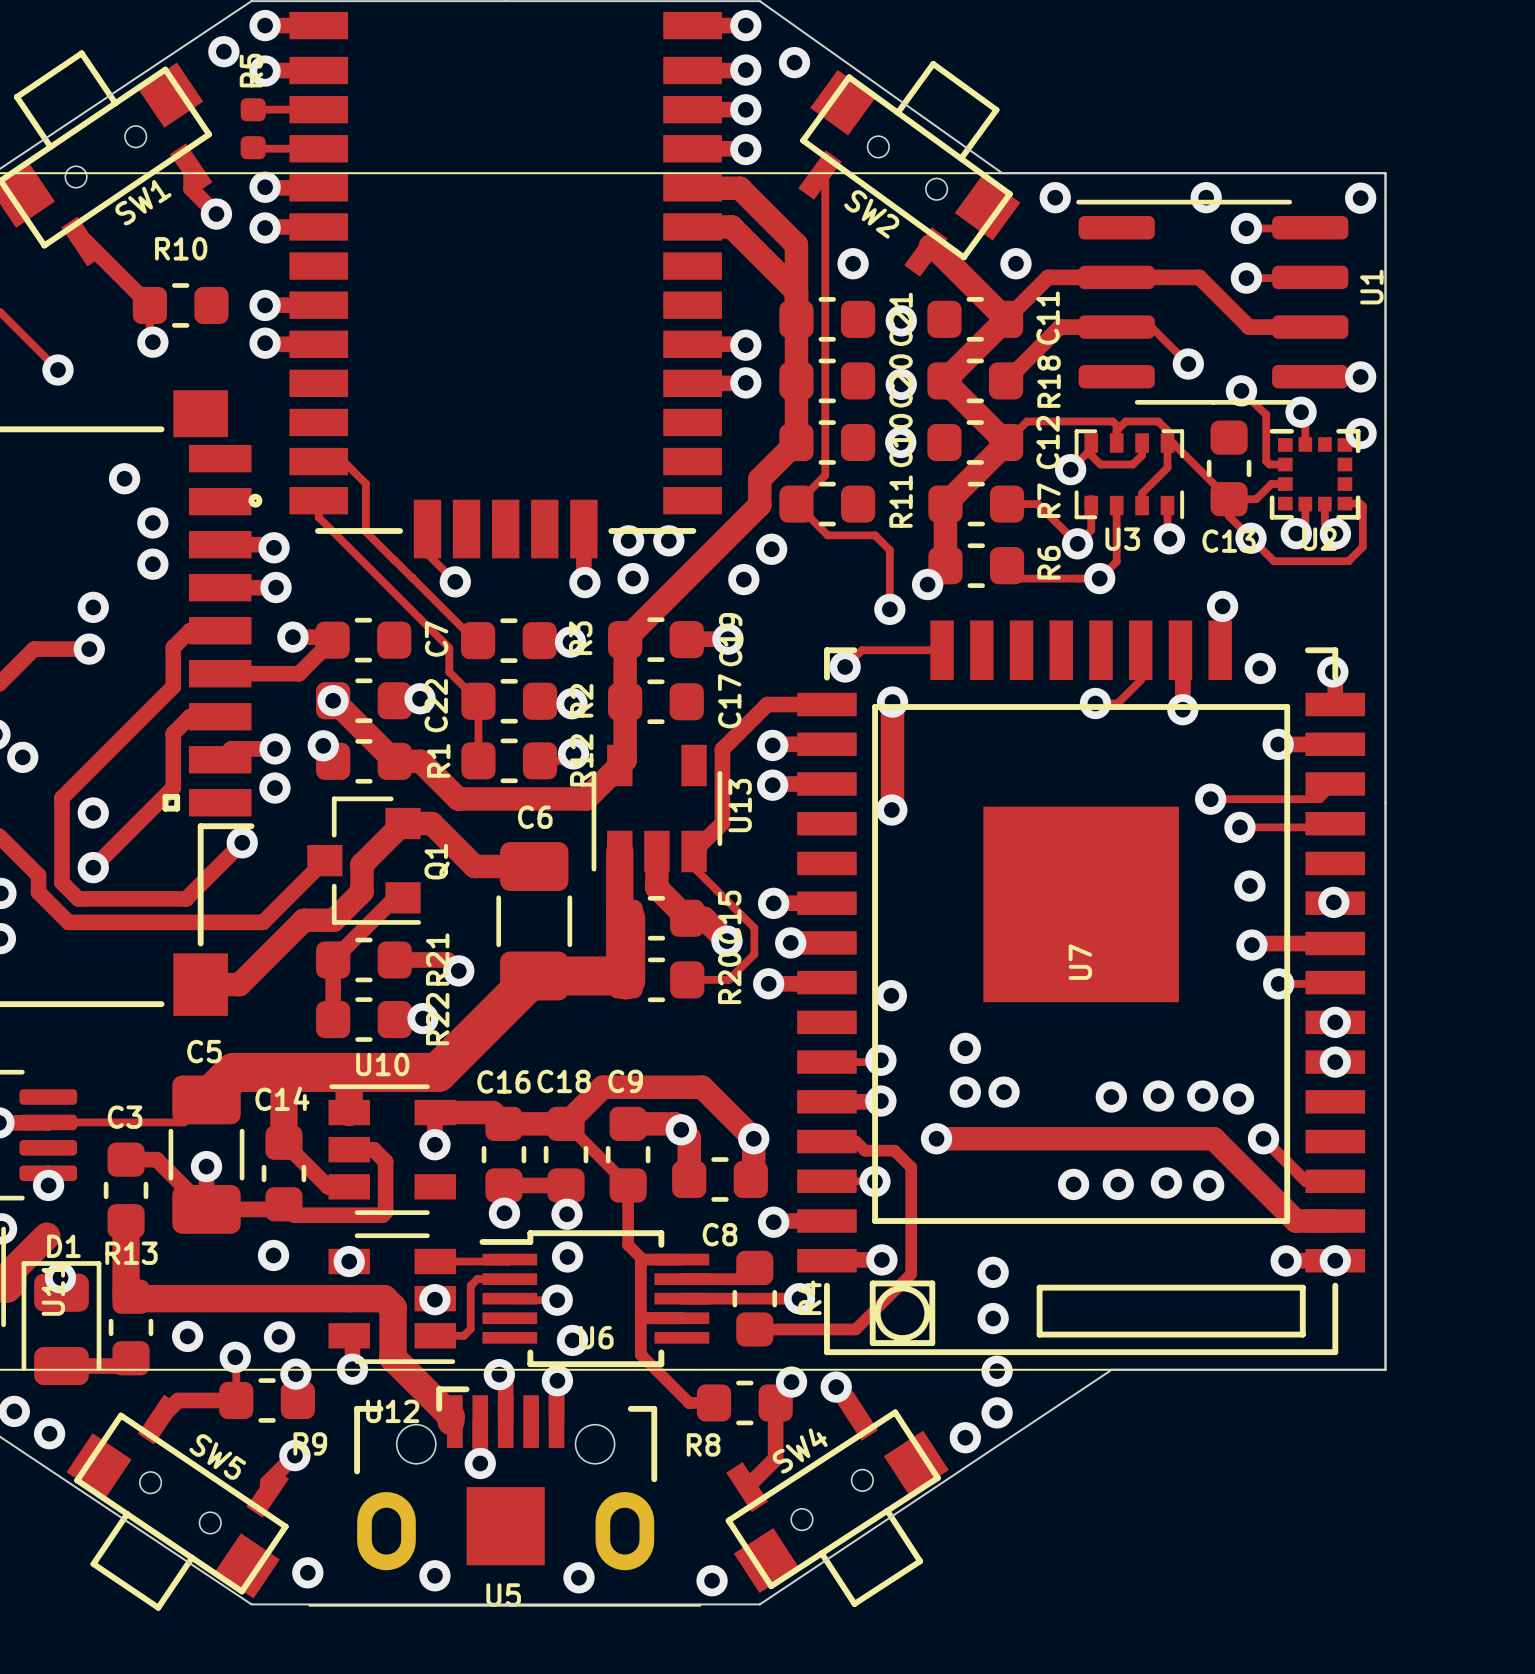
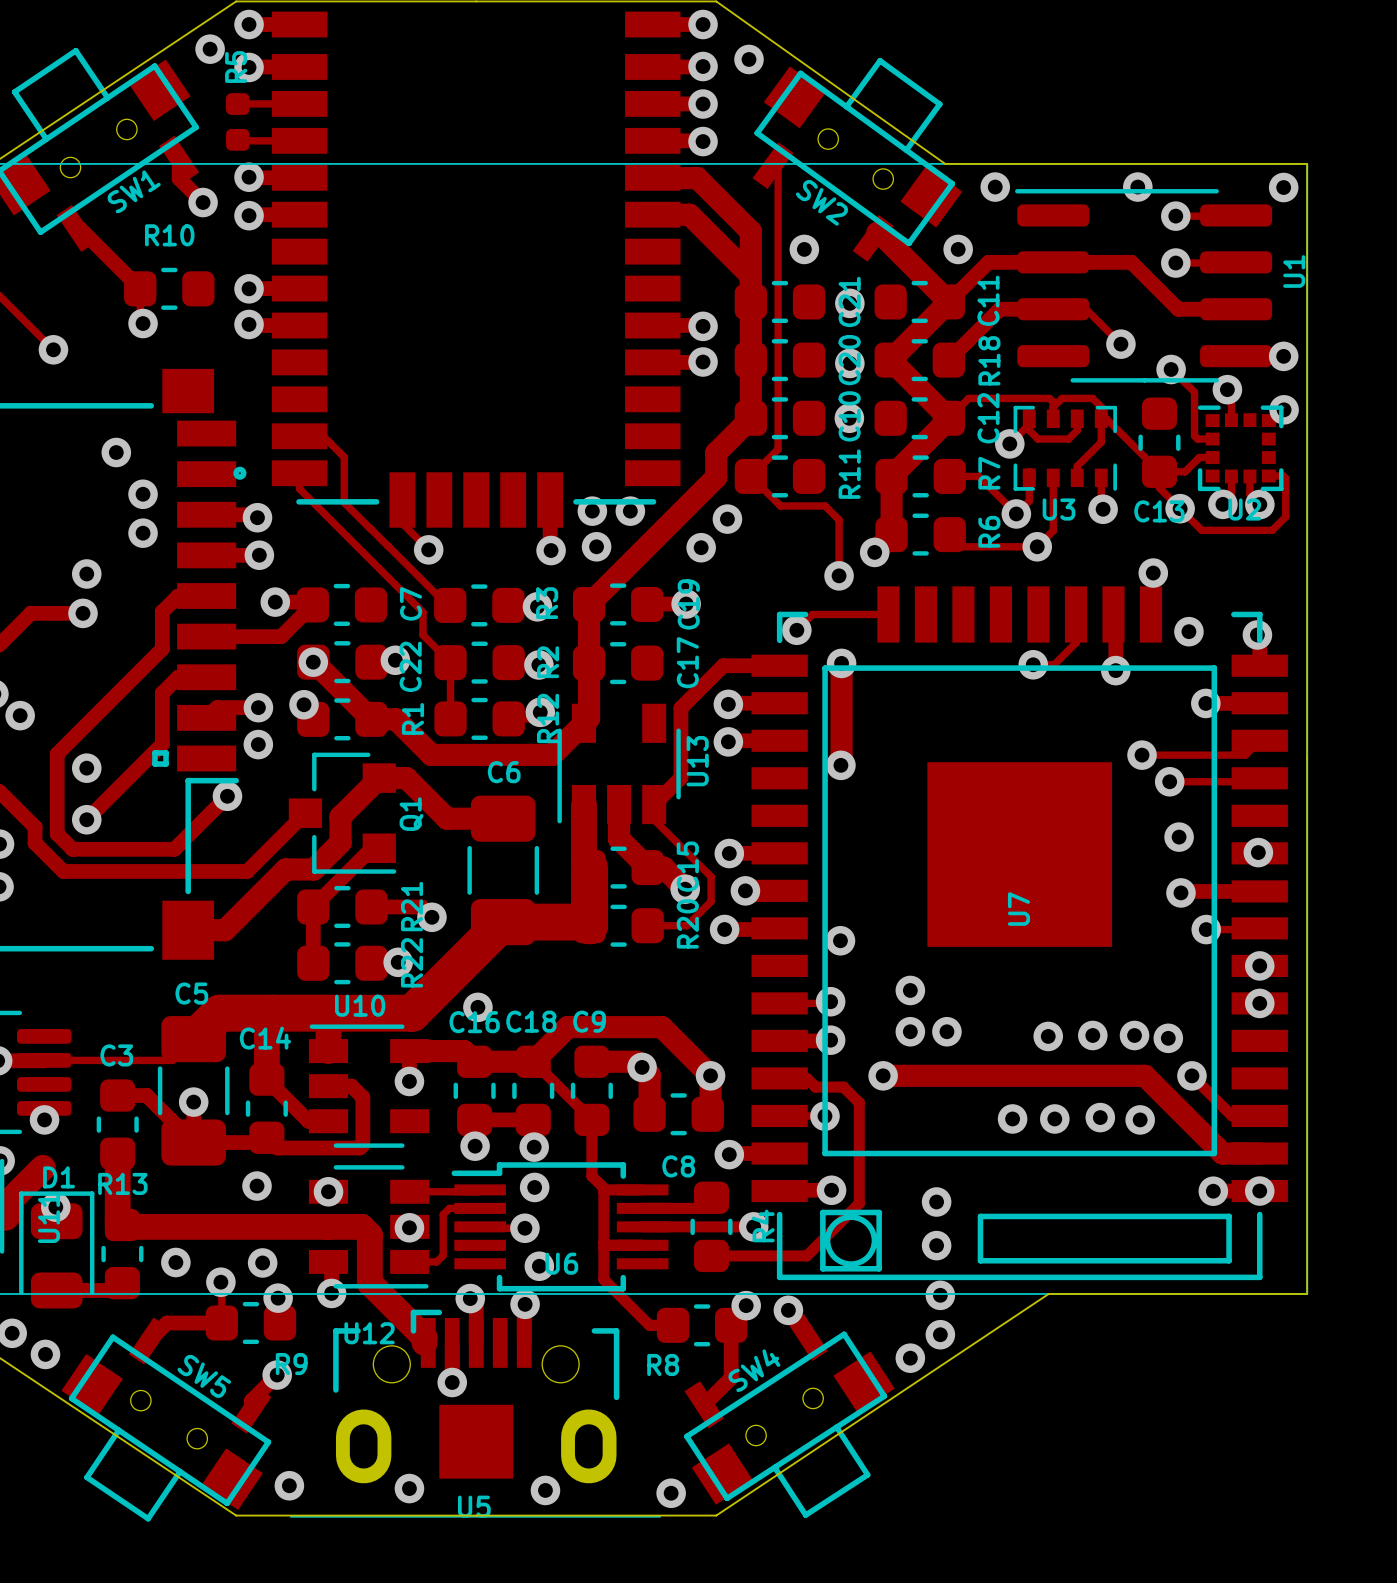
via: none -> (477, 1007)

